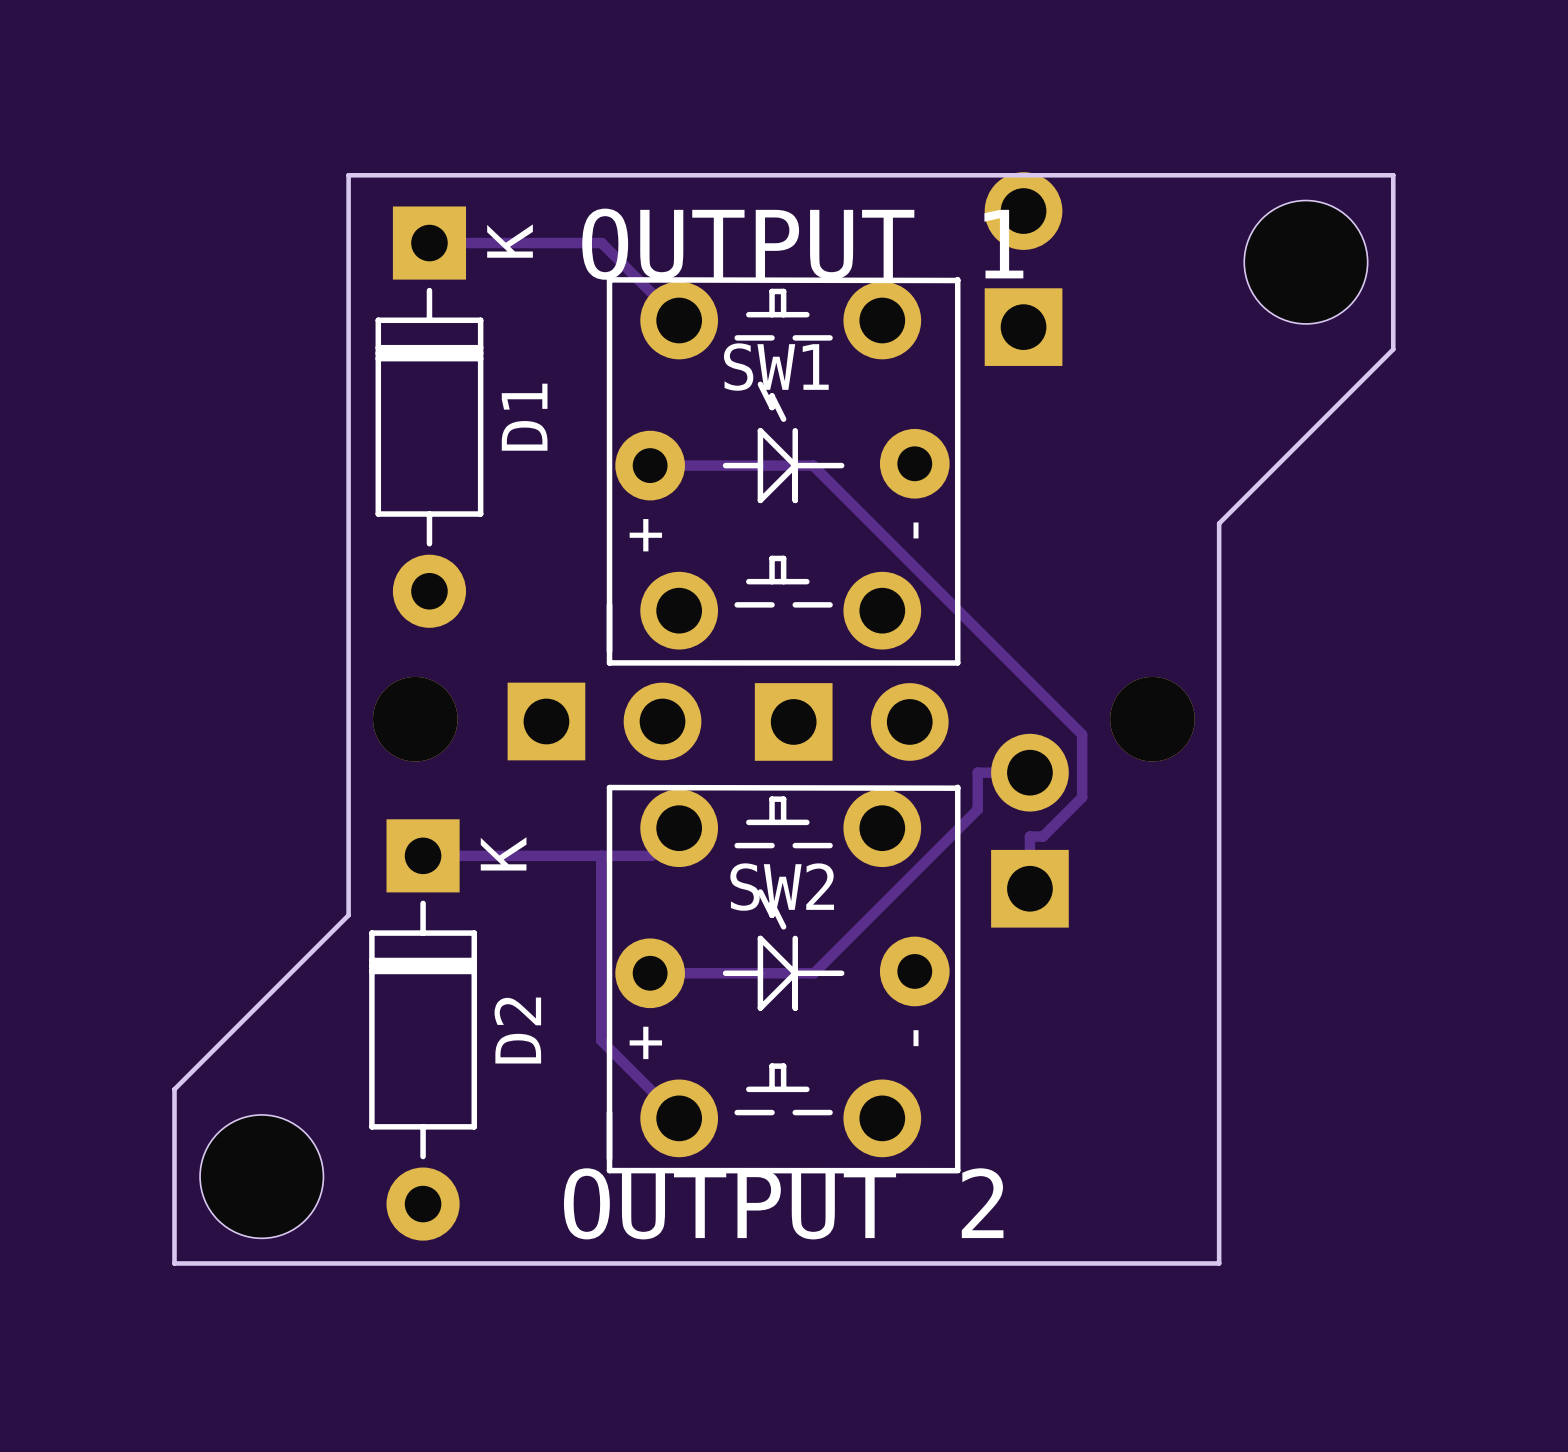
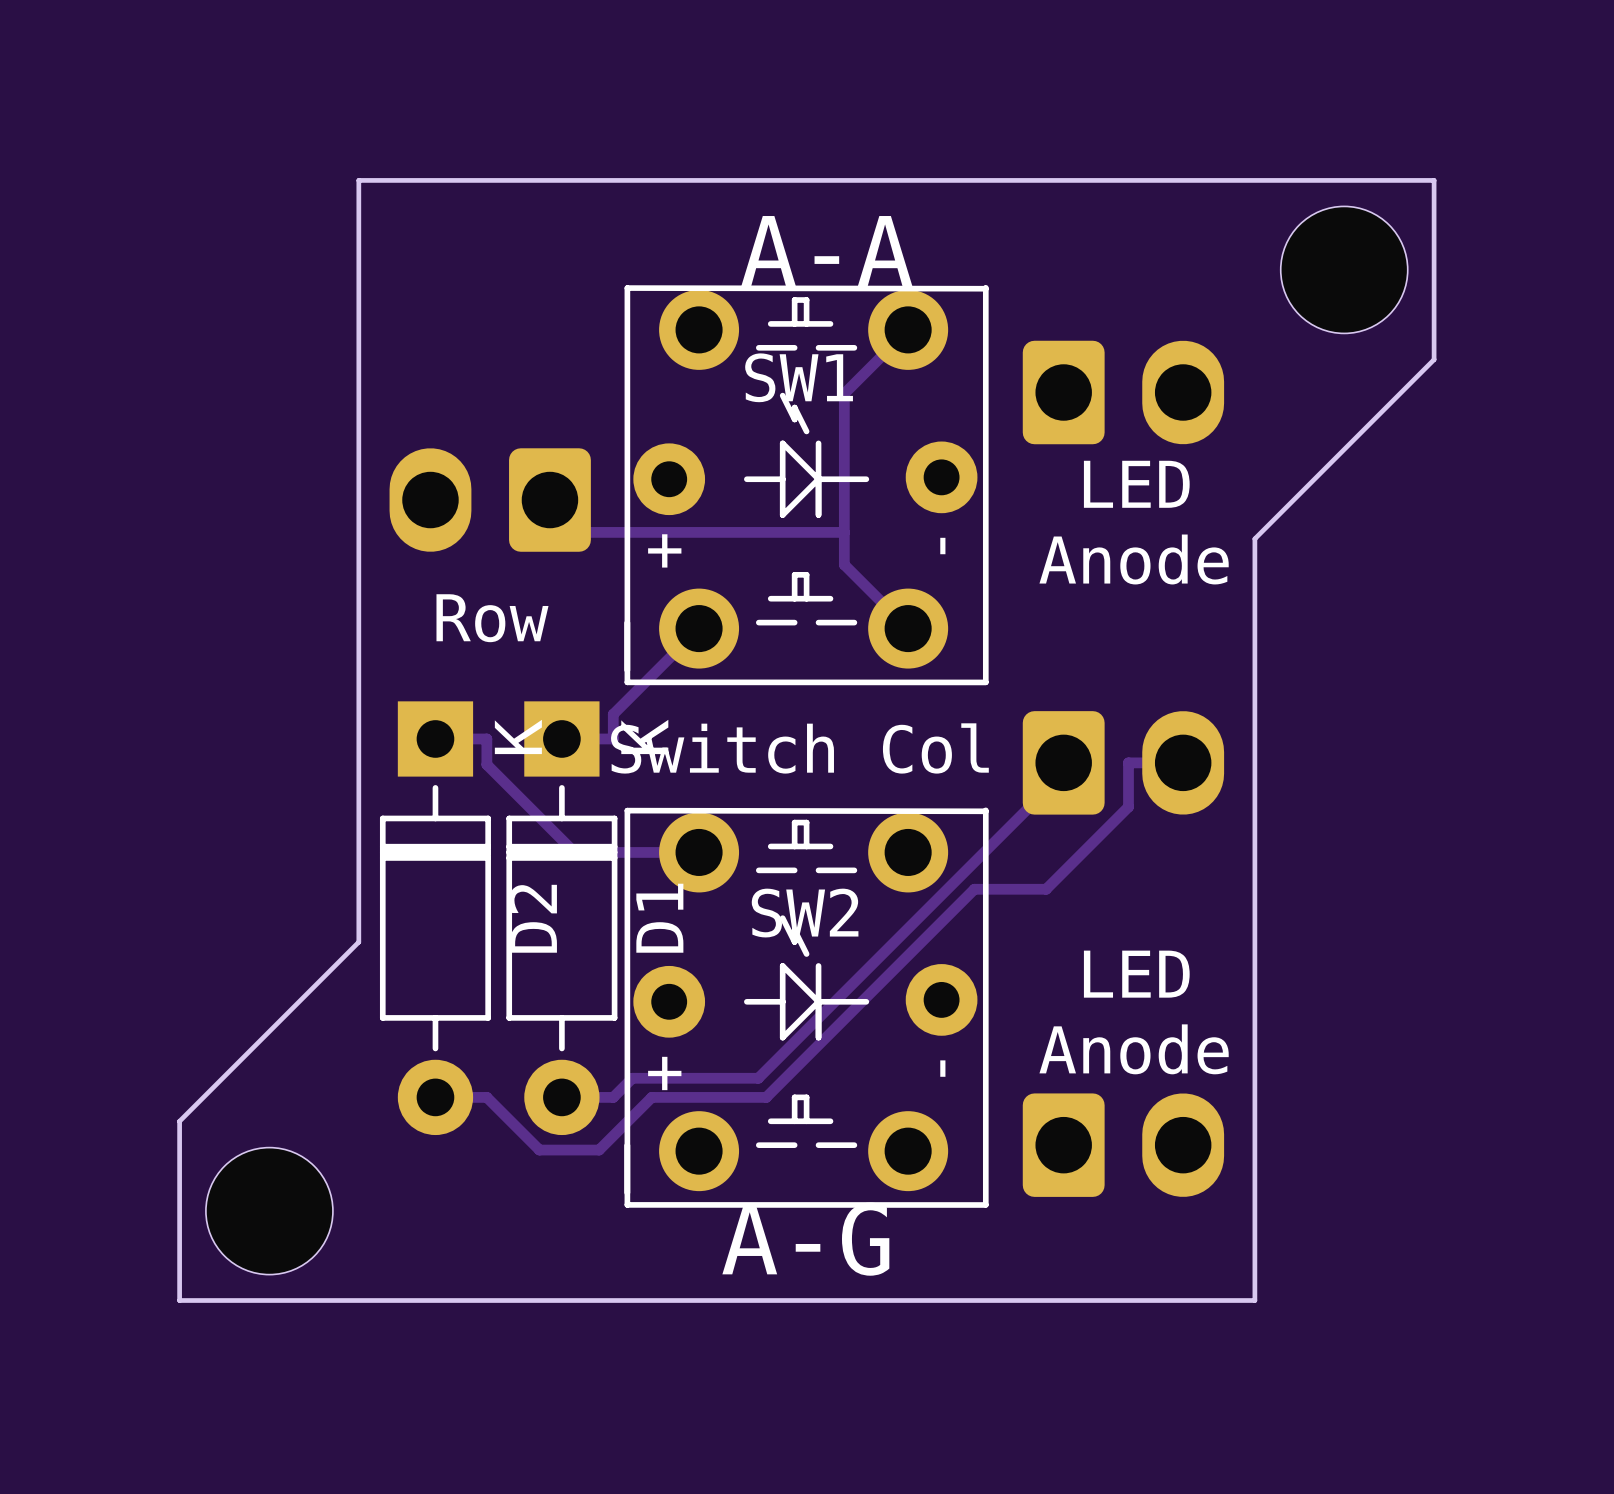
track: (429, 243) (601, 243) (679, 320) -> none
text: OUTPUT 1 (802, 244) -> A-A (826, 251)
part: (1023, 269) -> none
track: none -> (908, 329) (844, 393) (844, 564) (908, 628)
part: none -> (1123, 392)
D1 position: (429, 417) -> (561, 918)
track: (650, 465) (813, 465) (1082, 734) (1082, 797) (1042, 836) (1029, 836) (1029, 888) -> none
text: none -> LED (1136, 484)
part: none -> (490, 500)
track: none -> (549, 500) (582, 532) (844, 532)
text: none -> Anode (1134, 559)
text: none -> Row (492, 618)
track: none -> (699, 628) (613, 714) (613, 738) (561, 738)
part: (415, 719) -> none
part: (1152, 719) -> none
part: (604, 721) -> none
part: (851, 721) -> none
text: none -> Switch Col (799, 748)
track: none -> (1063, 762) (1063, 772) (758, 1078) (632, 1078) (613, 1097) (561, 1097)
part: none -> (1123, 762)
track: none -> (1183, 762) (1128, 762) (1128, 806) (1046, 889) (974, 889) (766, 1097) (651, 1097) (599, 1150) (539, 1150) (486, 1097) (435, 1097)
track: (1029, 772) (977, 772) (977, 809) (814, 973) (650, 973) -> none
track: (679, 828) (651, 855) (423, 855) -> (699, 852) (574, 852) (486, 764) (486, 738) (435, 738)
part: (1029, 830) -> none
track: (601, 855) (601, 1040) (679, 1118) -> none
text: none -> LED (1136, 974)
text: none -> Anode (1134, 1049)
D2 position: (423, 1029) -> (435, 918)
part: none -> (1123, 1145)
text: OUTPUT 2 (783, 1203) -> A-G (805, 1239)

